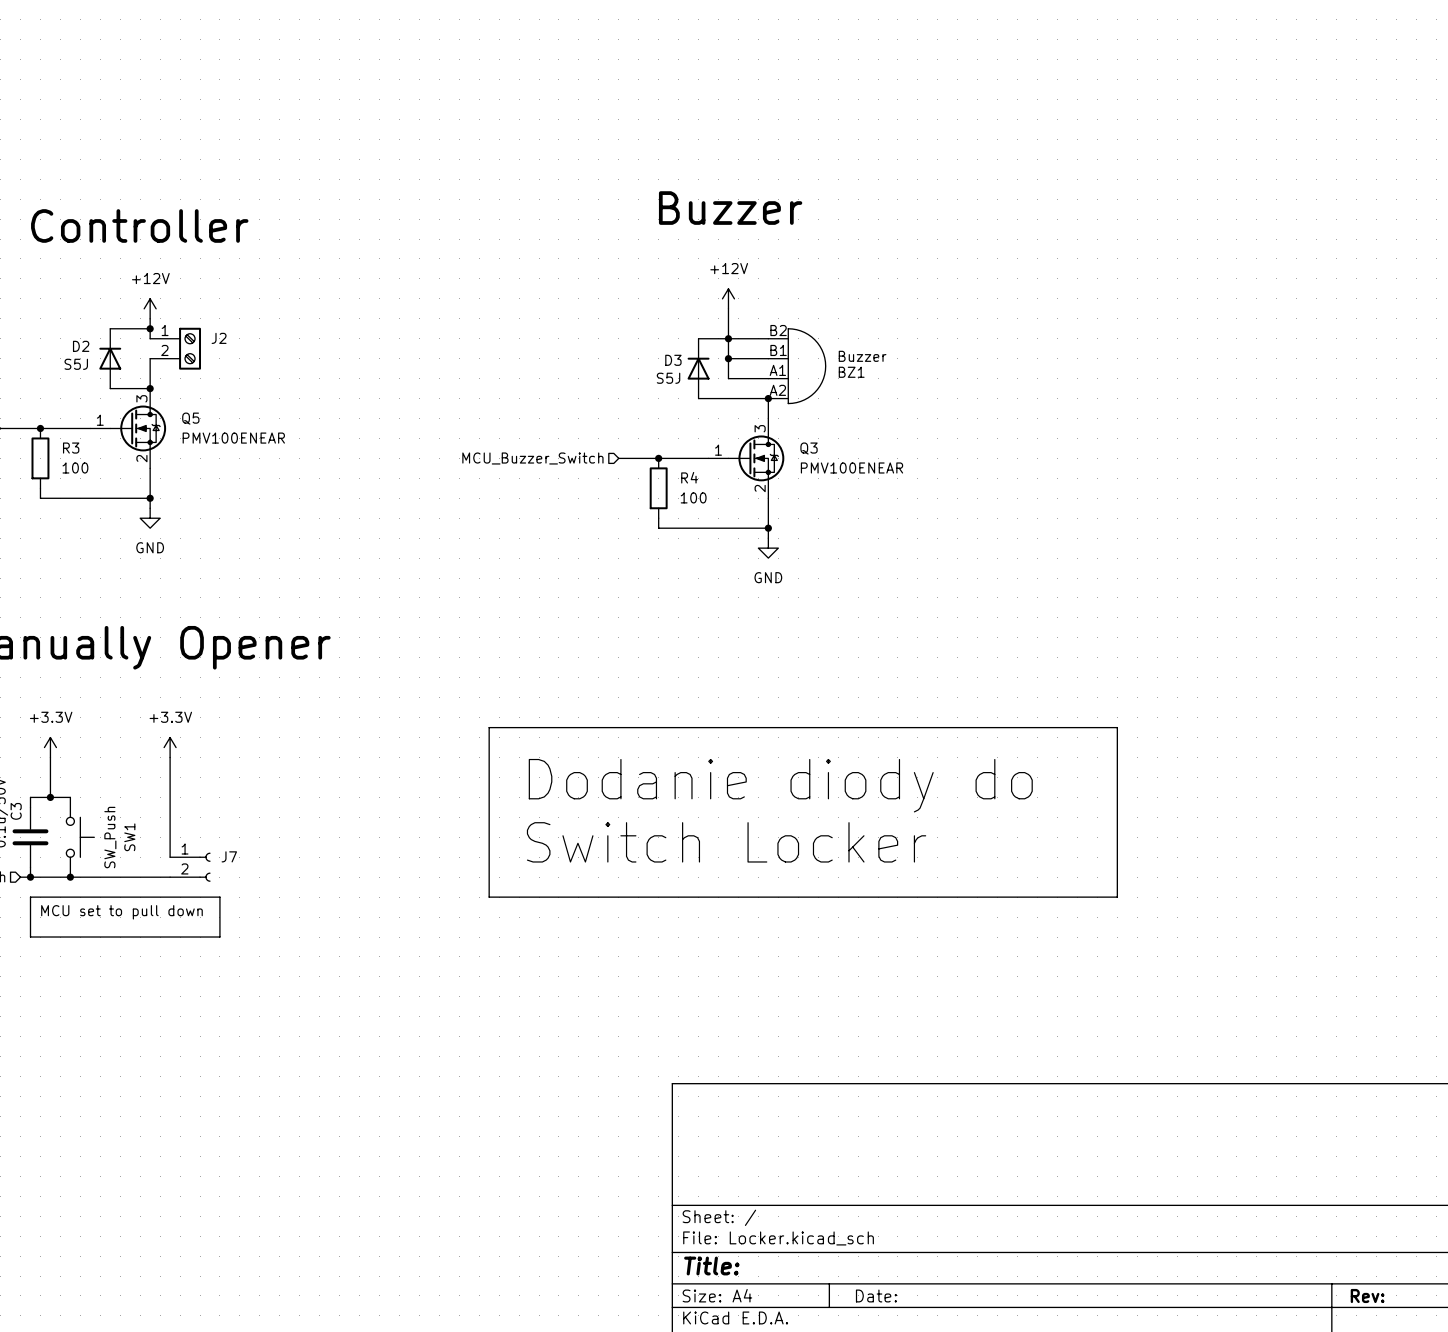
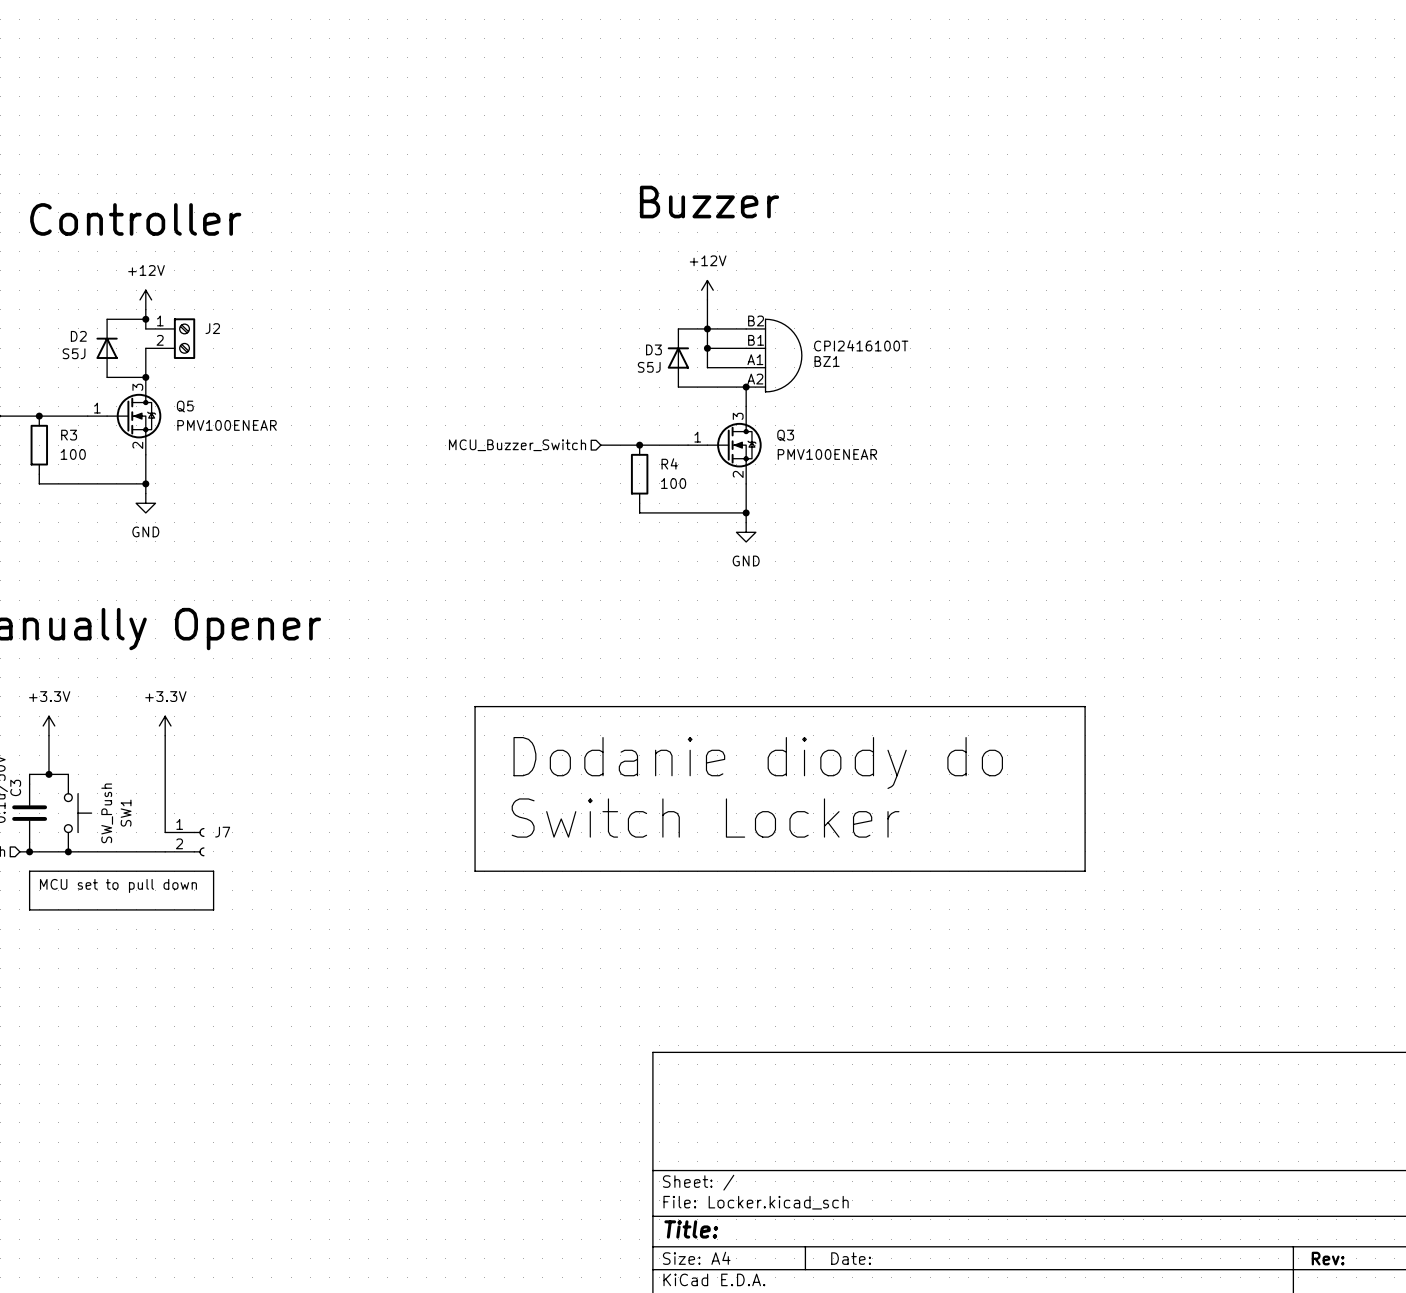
BZ1 value: Buzzer (862, 356) -> CPI2416100T (861, 345)

